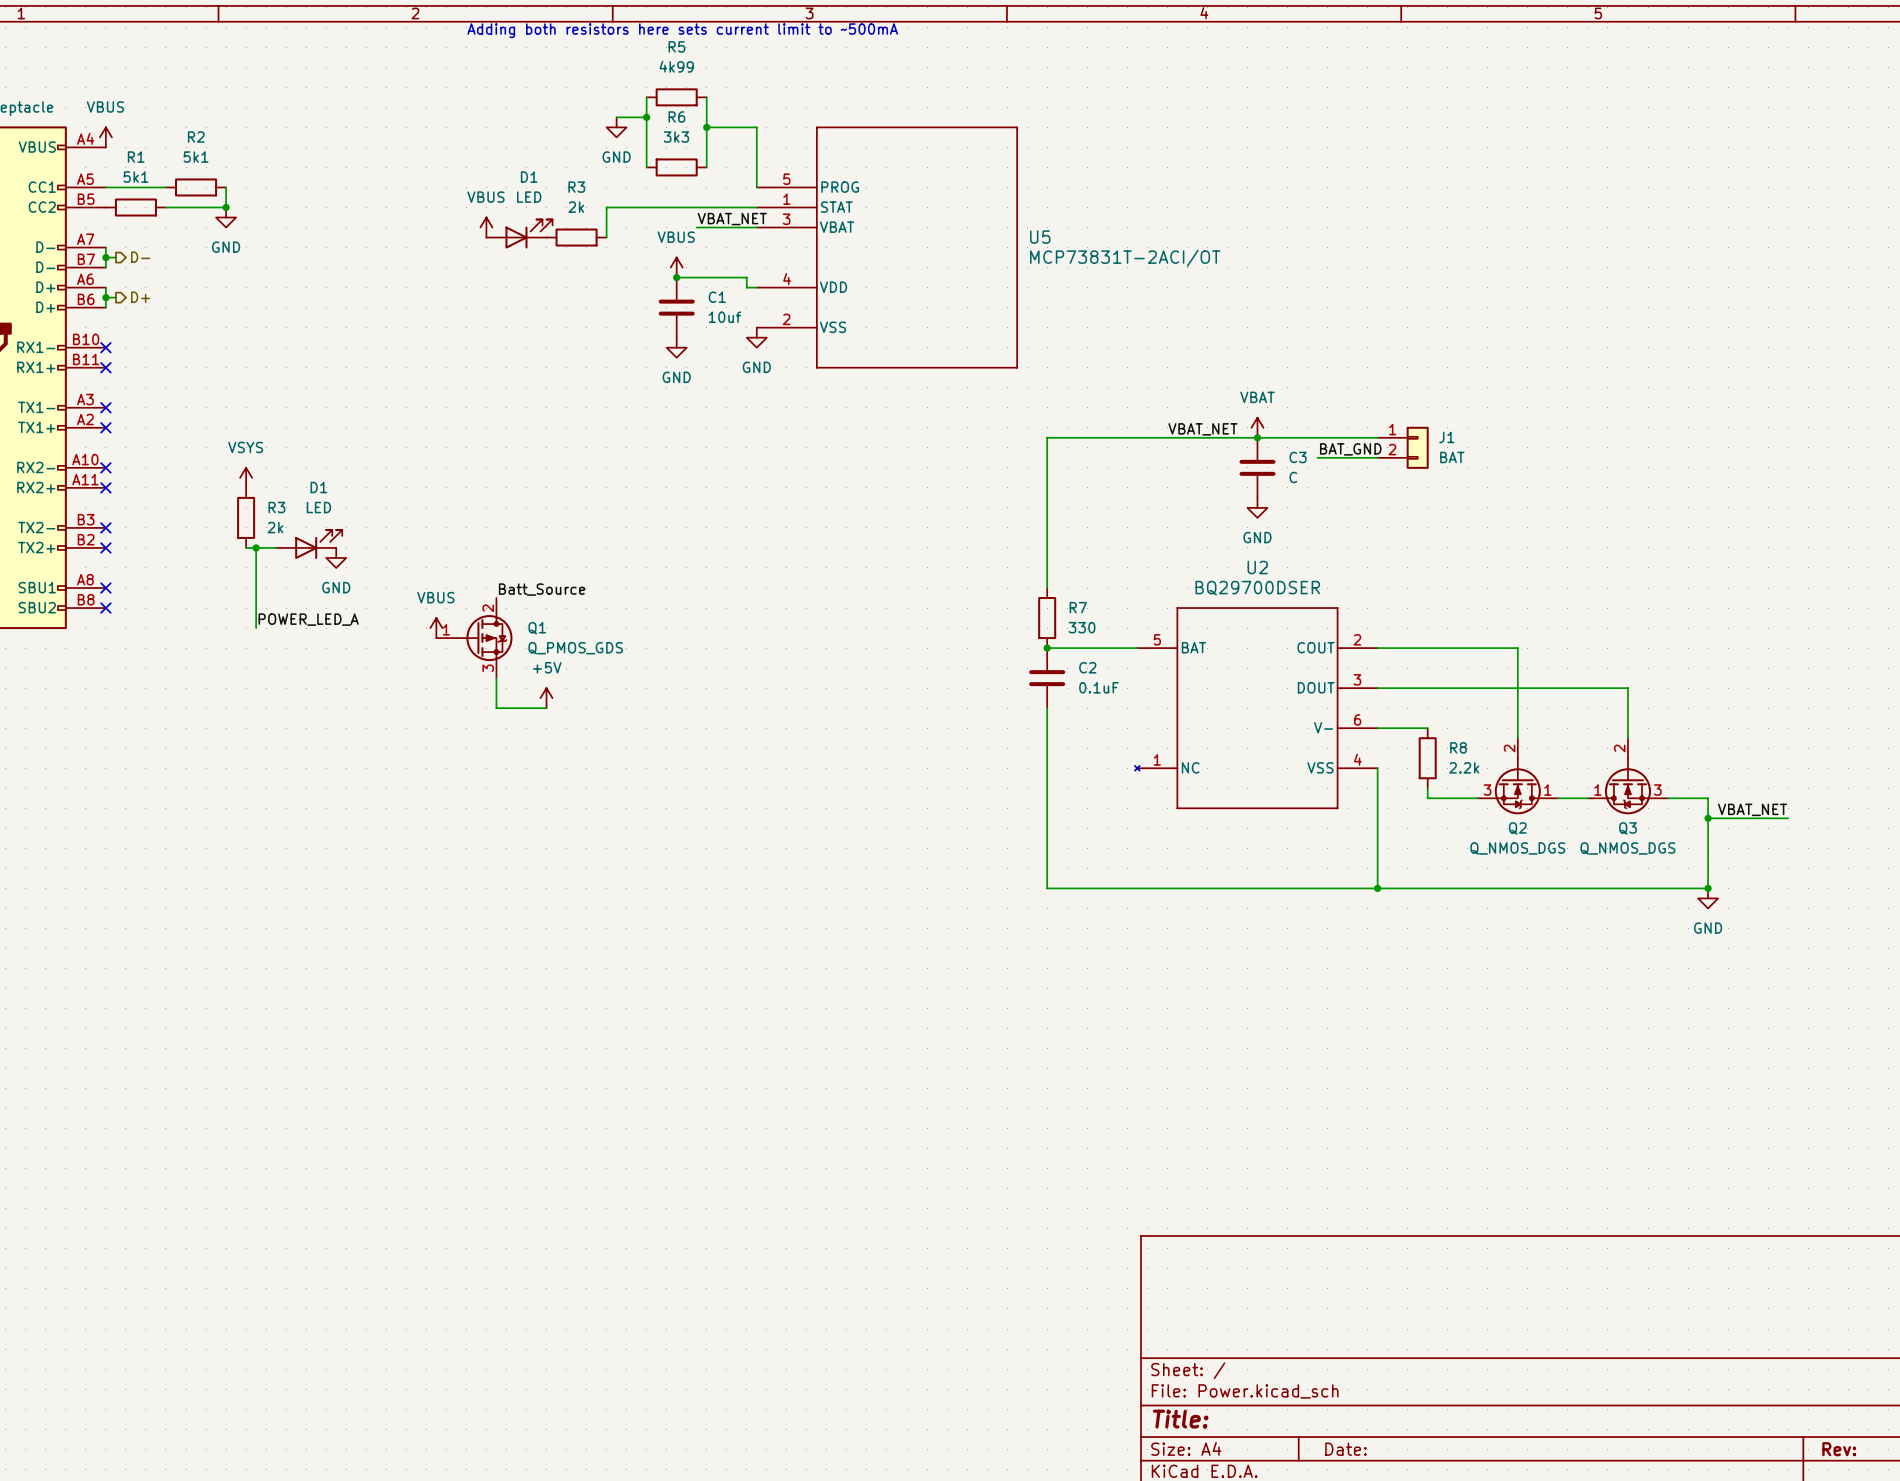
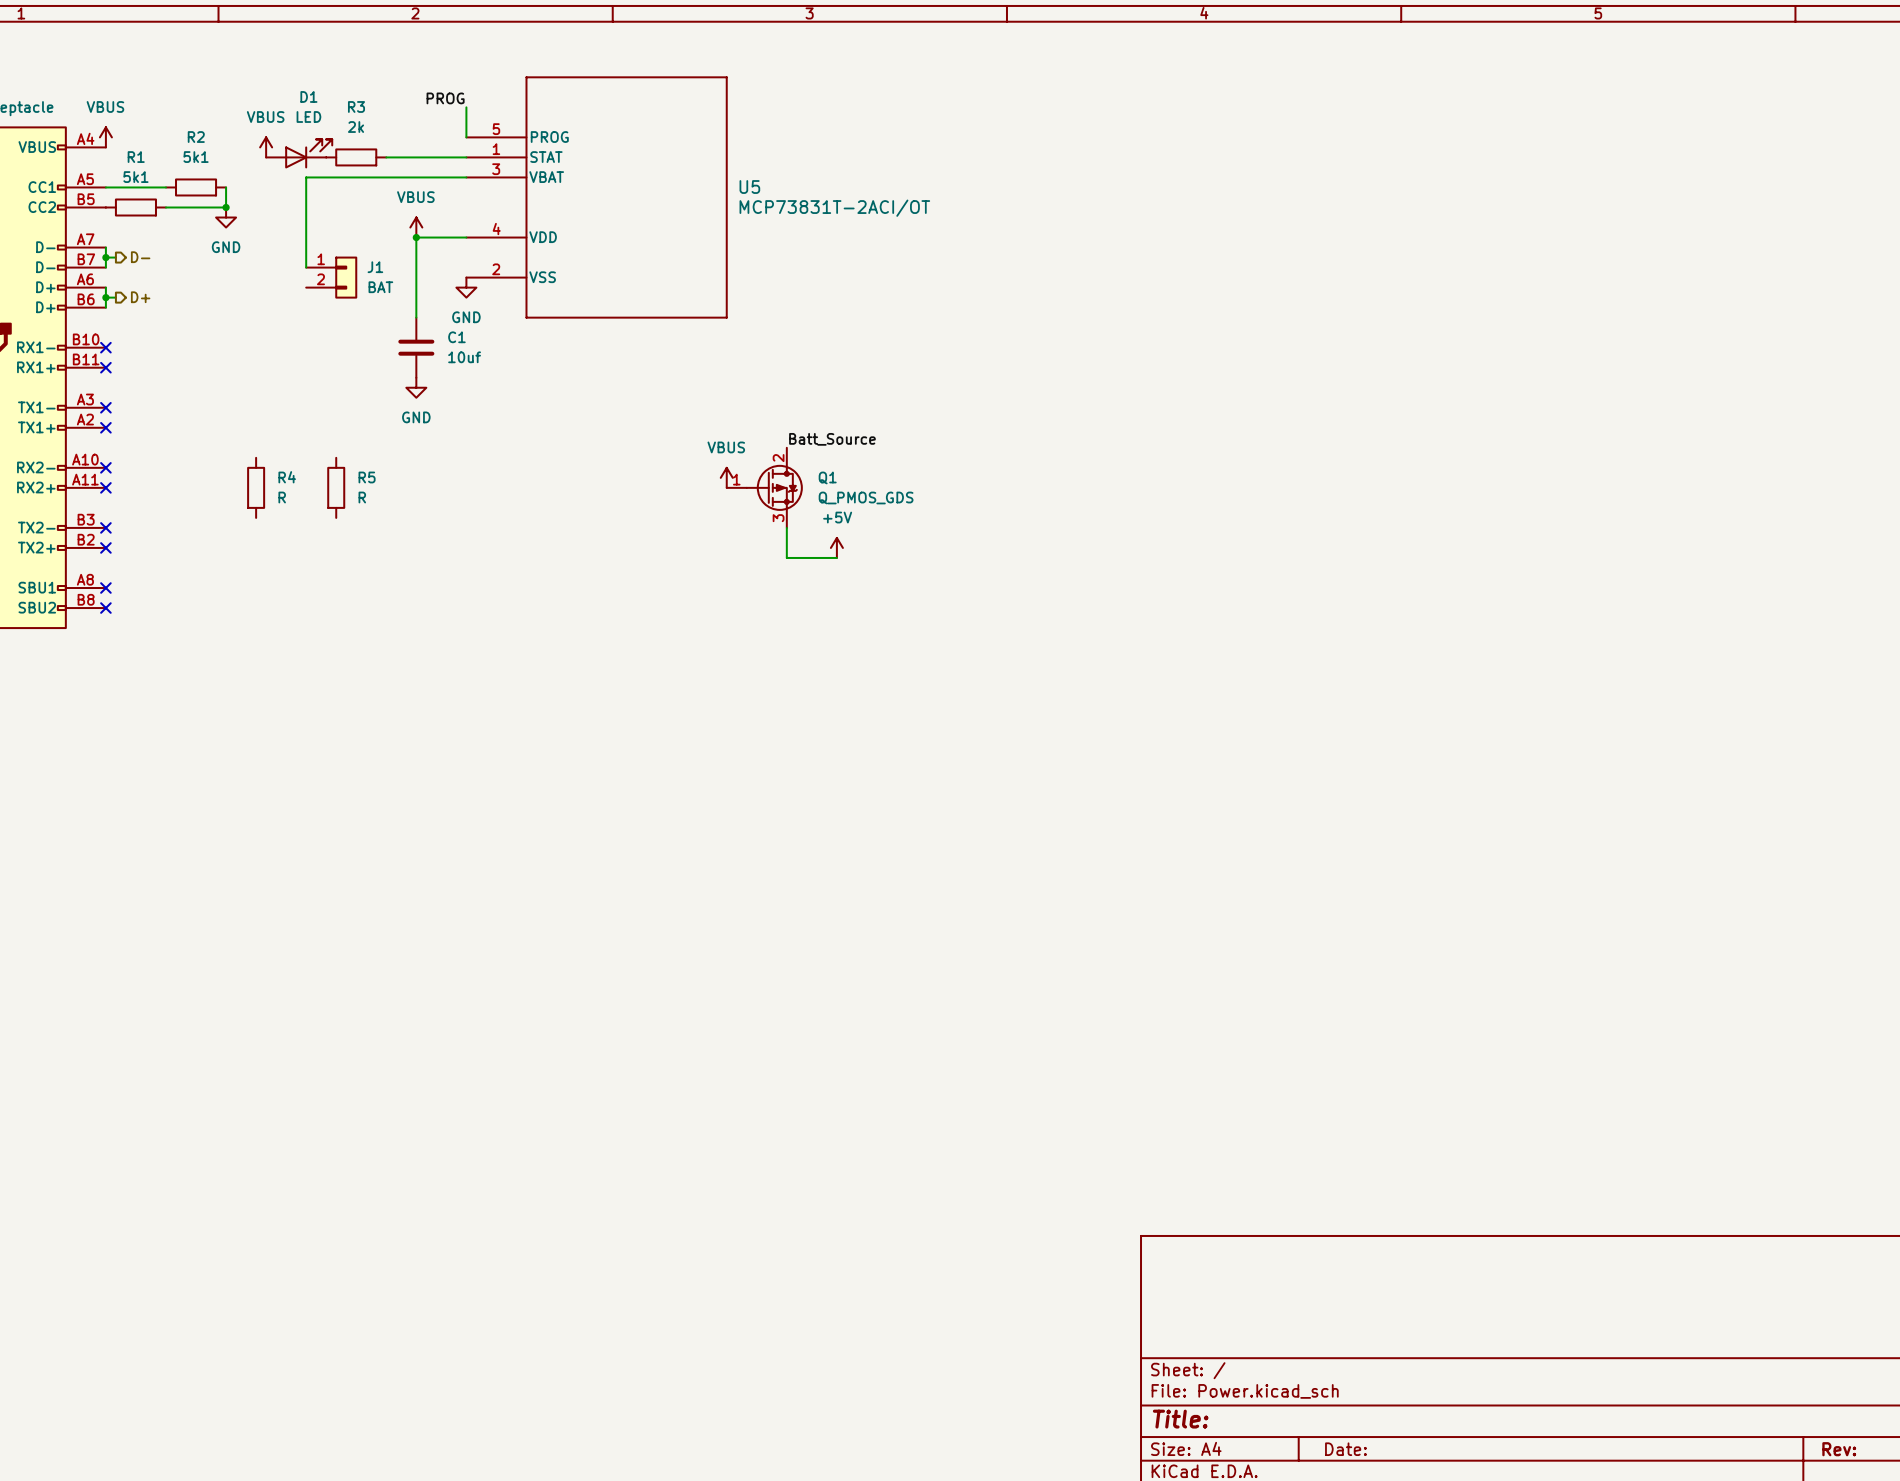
text: Adding both resistors here sets current limit to ~500mA (682, 30) -> none
R5 name position: R5 (676, 46) -> R5 (367, 477)
R5 value: 4k99 (676, 66) -> R (362, 497)
wire: (646, 97) (646, 167) -> none
R5 rotation: 0° (676, 97) -> 90° clockwise (336, 487)
R5 position: (676, 97) -> (336, 487)
wire: (706, 97) (706, 167) -> none
label: none -> PROG (445, 98)
wire: none -> (466, 107) (466, 137)
wire: (616, 117) (646, 117) -> none
junction: (646, 117) -> none
power symbol: GND (616, 127) -> none
wire: (706, 127) (756, 127) (756, 187) -> none
junction: (706, 127) -> none
power symbol: none -> VBUS (266, 147)
D1: none -> LED (299, 153)
R3: none -> 2k (356, 157)
wire: none -> (386, 157) (466, 157)
R6: 3k3 (676, 167) -> none
wire: none -> (466, 177) (306, 177) (306, 267)
wire: (756, 207) (606, 207) (606, 237) -> none
label: VBAT_NET (732, 219) -> none
power symbol position: VBUS (486, 227) -> VBUS (416, 227)
wire: (696, 227) (756, 227) -> none
D1: LED (519, 234) -> none
junction: none -> (416, 237)
wire: none -> (466, 237) (416, 237) (416, 317)
R3: 2k (576, 237) -> none
U5 position: (887, 247) -> (596, 197)
power symbol: VBUS (676, 267) -> none
wire: (676, 277) (746, 277) (746, 287) (756, 287) -> none
junction: (676, 277) -> none
power symbol: none -> GND (466, 287)
C1 position: (676, 307) -> (416, 347)
power symbol: GND (756, 337) -> none
power symbol: GND (676, 347) -> none
power symbol: none -> GND (416, 387)
power symbol: VBAT (1257, 427) -> none
label: VBAT_NET (1202, 429) -> none
junction: (1257, 437) -> none
wire: (1377, 437) (1047, 437) (1047, 588) -> none
label: none -> Batt_Source (832, 439)
J1 position: (1403, 447) -> (331, 277)
label: BAT_GND (1350, 449) -> none
wire: (1317, 457) (1377, 457) -> none
C3: C (1257, 467) -> none
power symbol: VSYS (246, 477) -> none
power symbol: none -> VBUS (726, 477)
R4: none -> R (256, 487)
power symbol: GND (1257, 507) -> none
R3: 2k (246, 517) -> none
wire: none -> (786, 527) (786, 557) (836, 557)
D1: LED (309, 544) -> none
wire: (246, 547) (276, 547) -> none
wire: (256, 547) (256, 628) -> none
junction: (256, 547) -> none
power symbol: none -> +5V (836, 547)
power symbol: GND (336, 557) -> none
label: Batt_Source (542, 589) -> none
R7: 330 (1047, 618) -> none
label: POWER_LED_A (308, 619) -> none
power symbol: VBUS (436, 628) -> none
Q1 position: (474, 638) -> (764, 487)
wire: (1047, 648) (1137, 648) -> none
junction: (1047, 648) -> none
wire: (1377, 648) (1517, 648) (1517, 738) -> none
wire: (496, 678) (496, 708) (546, 708) -> none
C2: 0.1uF (1047, 678) -> none
wire: (1377, 688) (1627, 688) (1627, 738) -> none
power symbol: +5V (546, 698) -> none
wire: (1047, 708) (1047, 888) (1708, 888) (1708, 798) (1668, 798) -> none
U2: BQ29700DSER (1256, 708) -> none
wire: (1377, 728) (1427, 728) -> none
R8: 2.2k (1427, 758) -> none
wire: (1377, 768) (1377, 888) -> none
Q2: Q_NMOS_DGS (1517, 776) -> none
Q3: Q_NMOS_DGS (1627, 776) -> none
wire: (1427, 788) (1427, 798) (1477, 798) -> none
wire: (1557, 798) (1587, 798) -> none
label: VBAT_NET (1752, 809) -> none
wire: (1708, 818) (1788, 818) -> none
junction: (1708, 818) -> none
junction: (1377, 888) -> none
junction: (1708, 888) -> none
power symbol: GND (1708, 898) -> none

